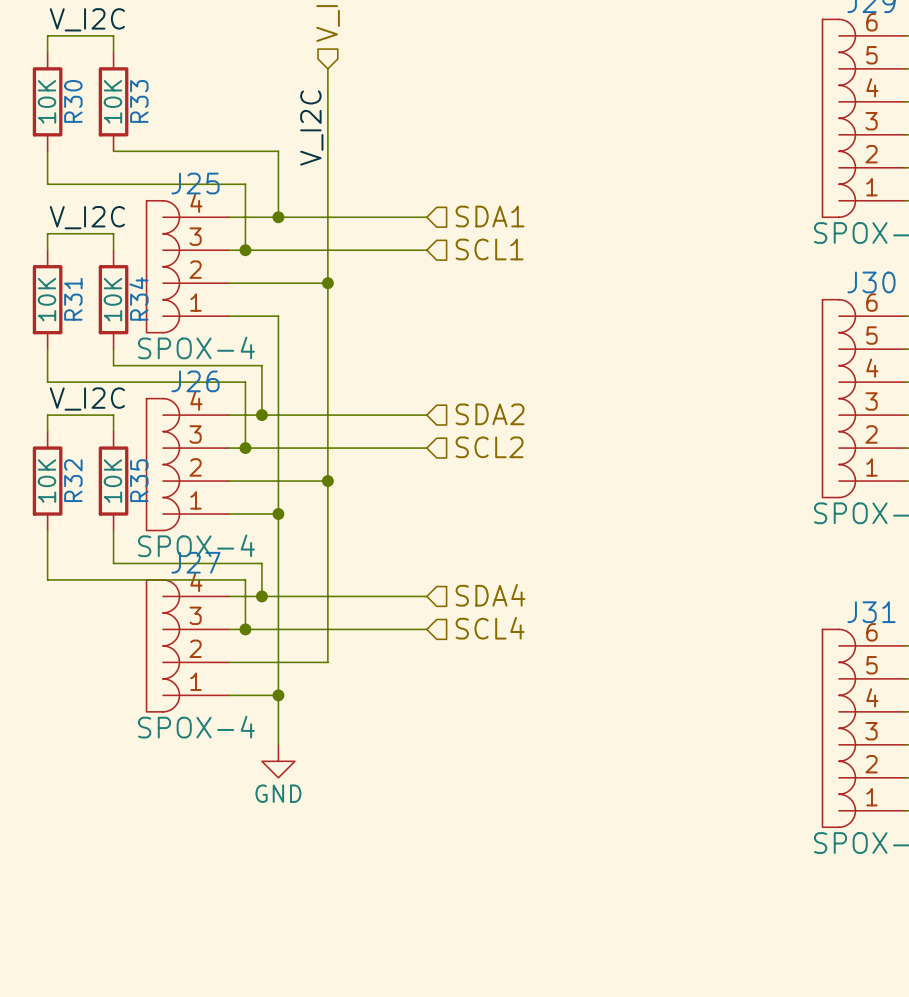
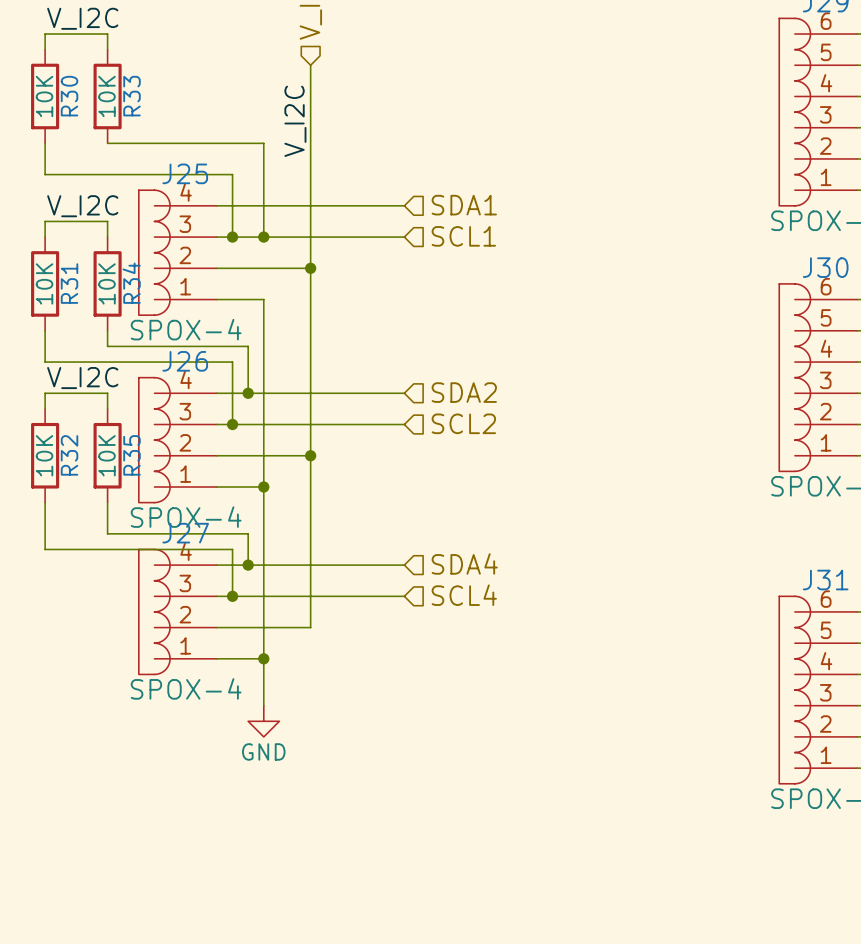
wire: none -> (263, 205) (263, 237)
junction position: (278, 217) -> (263, 237)

